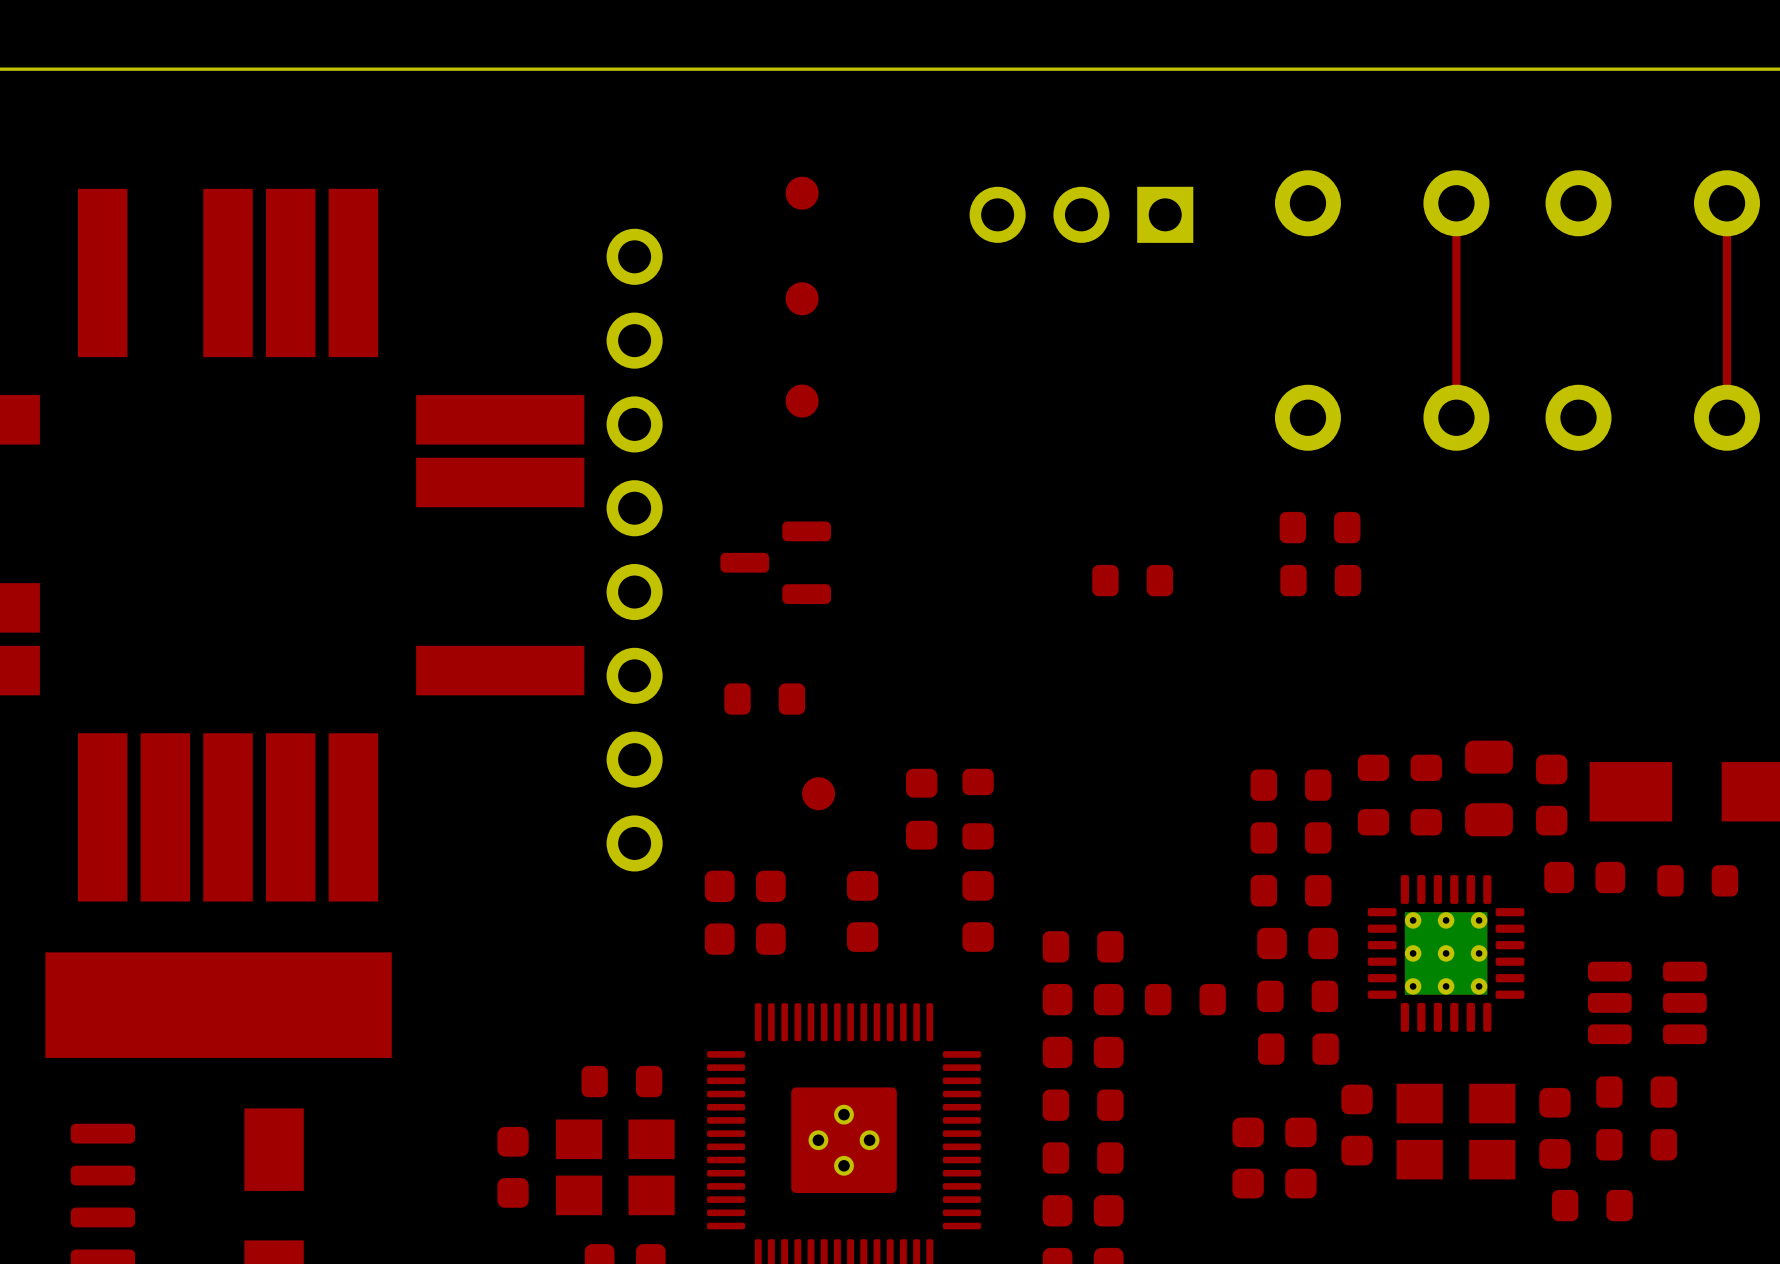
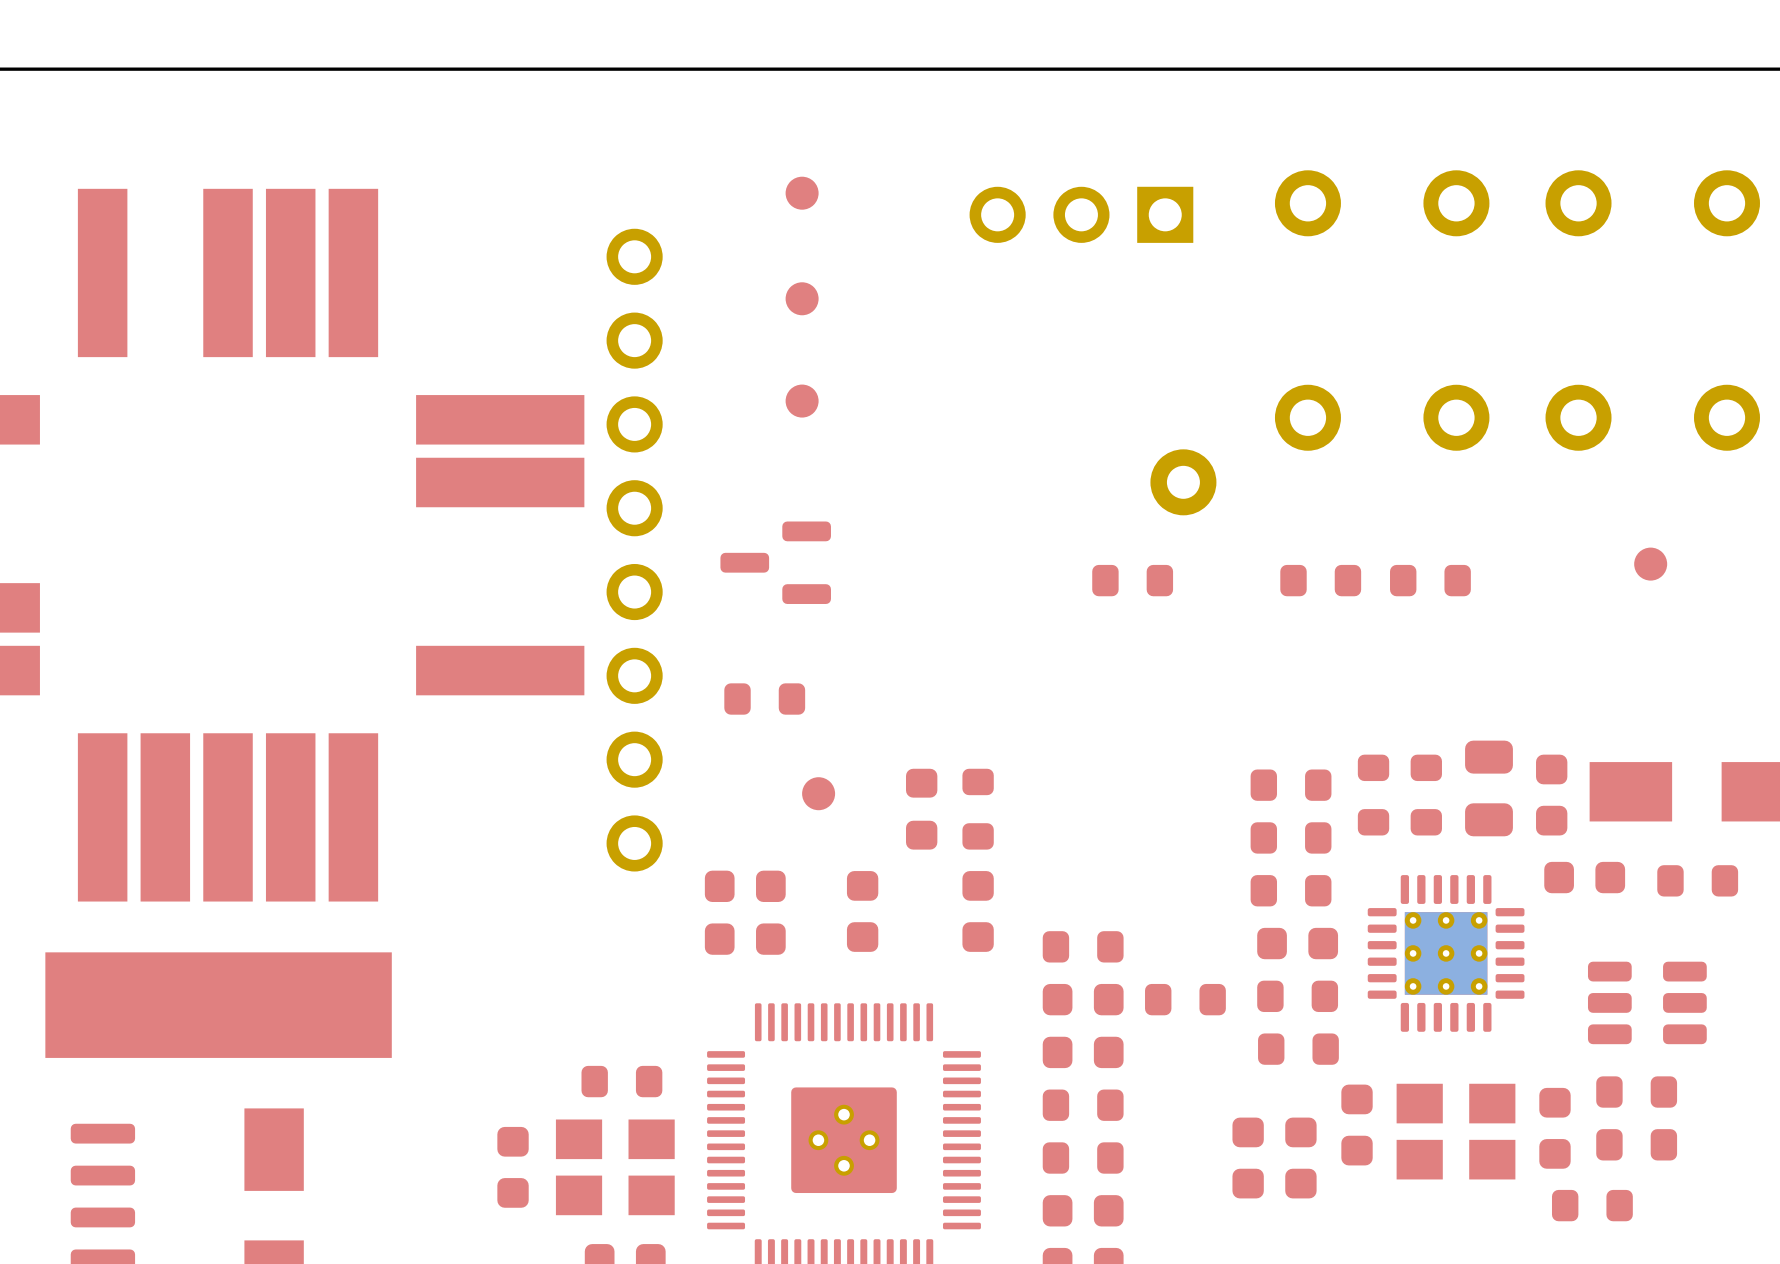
top track: (1456, 203) (1456, 417) -> none
top track: (1726, 203) (1726, 417) -> none
part: none -> (1183, 482)
part position: (1320, 527) -> (1430, 580)
part: none -> (1650, 564)

